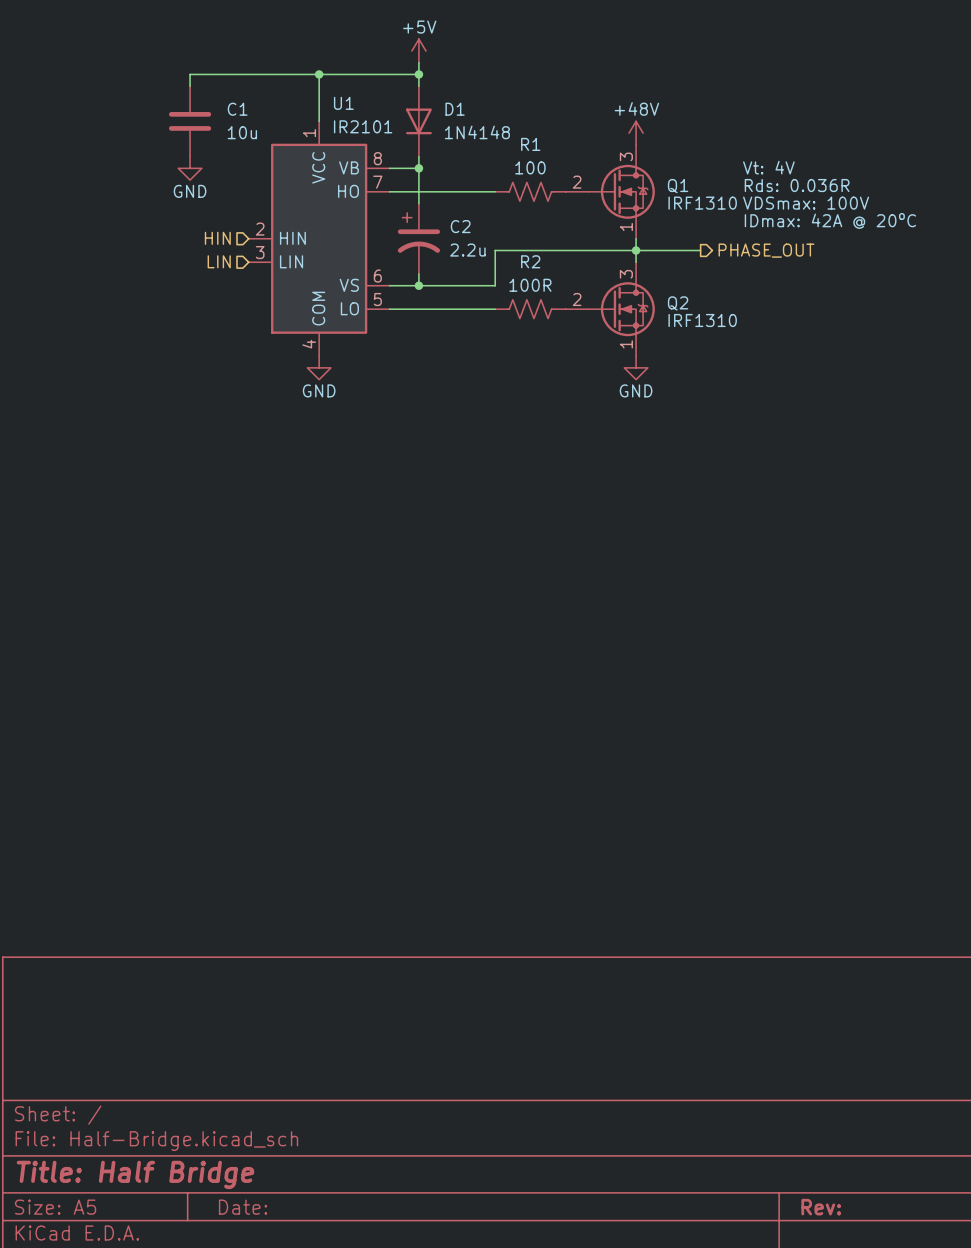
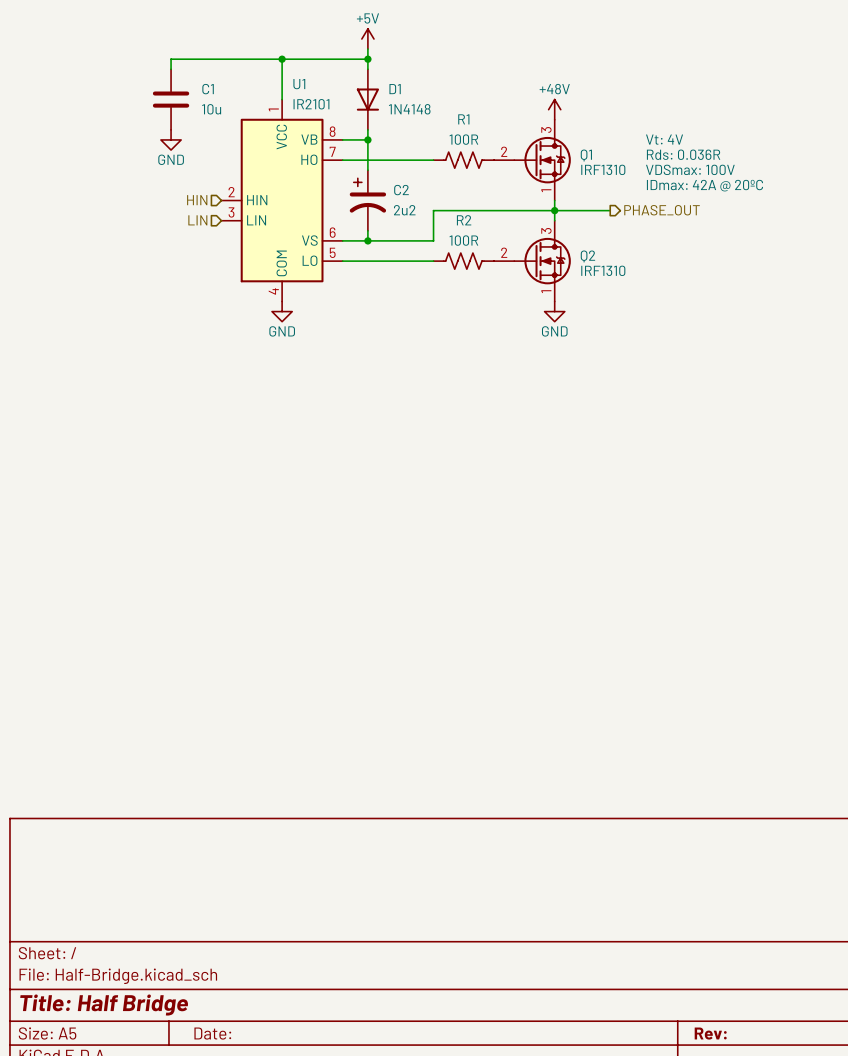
R1 value: 100 (530, 167) -> 100R (463, 139)
C2 value: 2.2u (467, 250) -> 2u2 (404, 210)

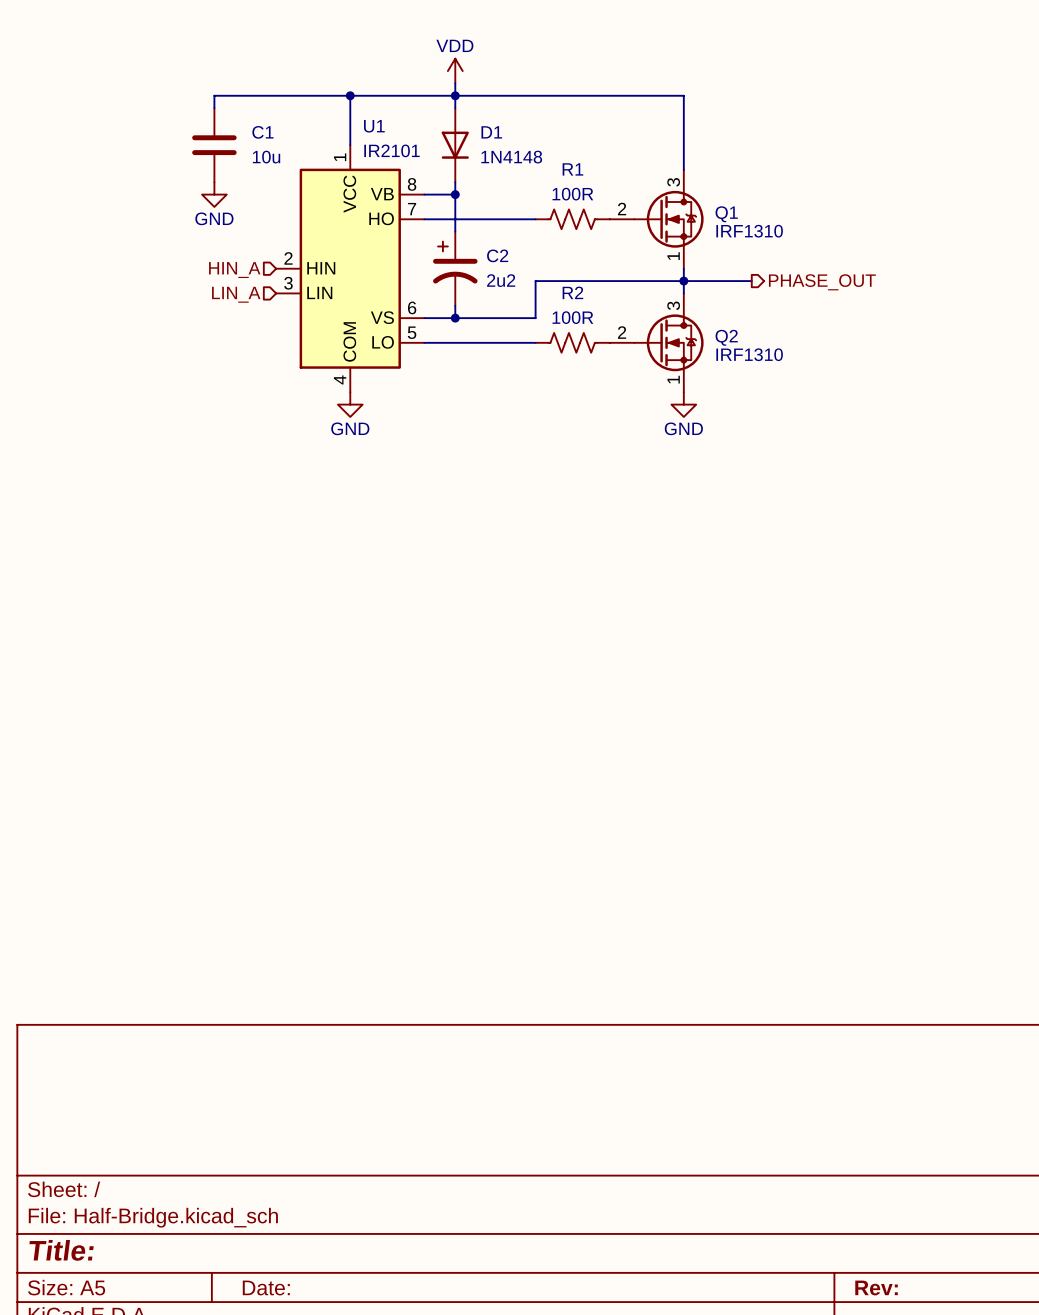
power symbol: +5V (367, 39) -> VDD (455, 71)
wire: none -> (455, 95) (683, 95) (683, 169)
power symbol: +48V (554, 109) -> none
Q1 text: Vt: 4V (664, 139) -> none
Q1 text: Rds: 0.036R (683, 154) -> none
Q1 text: VDSmax: 100V (690, 169) -> none
Q1 text: IDmax: 42A @ 20ºC (704, 185) -> none
hierarchical label: HIN (197, 200) -> HIN_A (234, 270)
hierarchical label: LIN (197, 220) -> LIN_A (236, 294)
title block: Title: Half Bridge (104, 1005) -> Title: (61, 1250)

